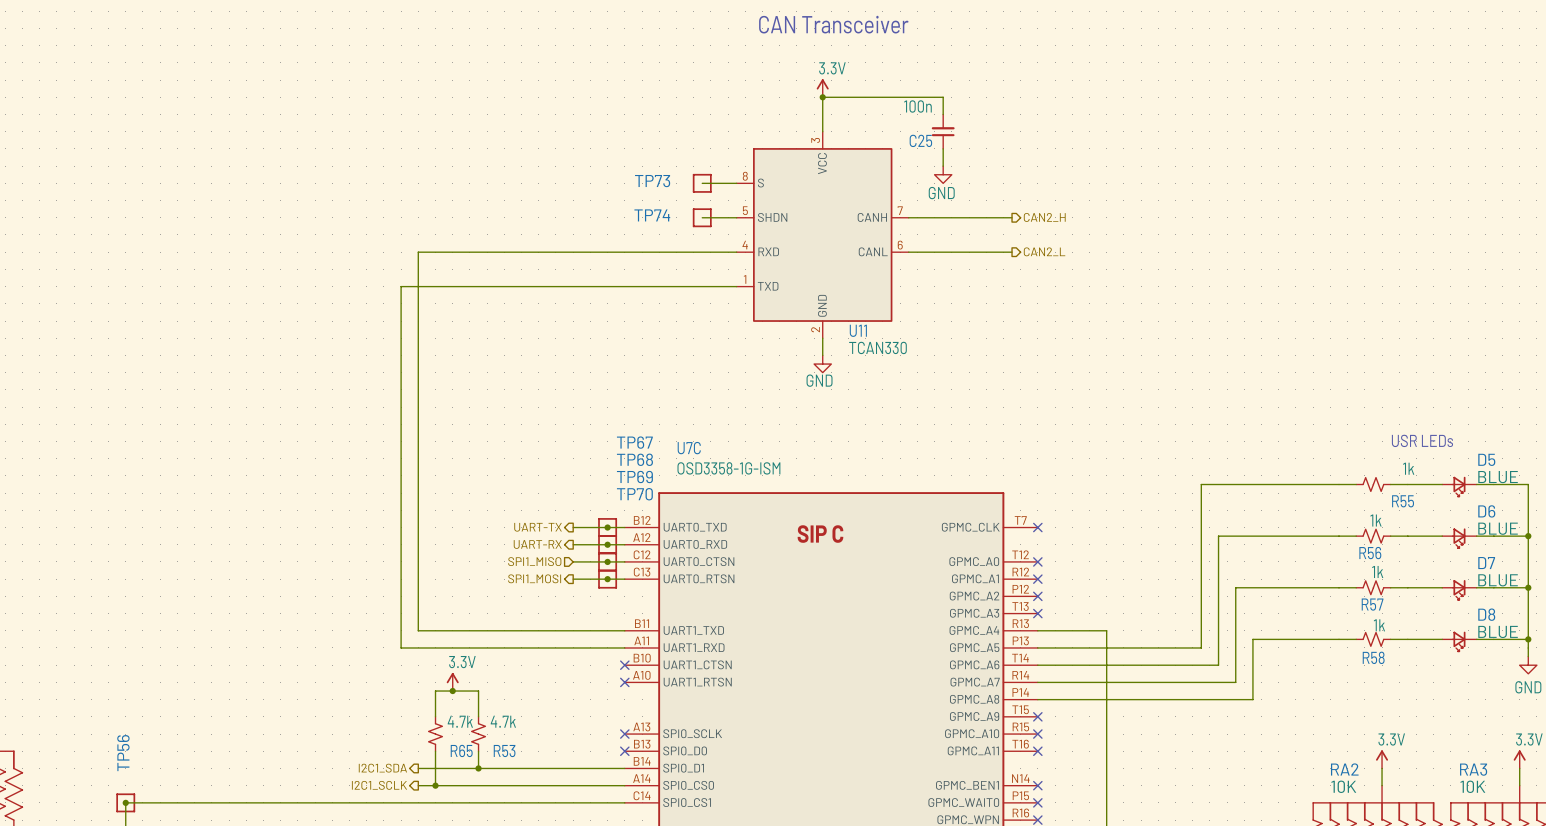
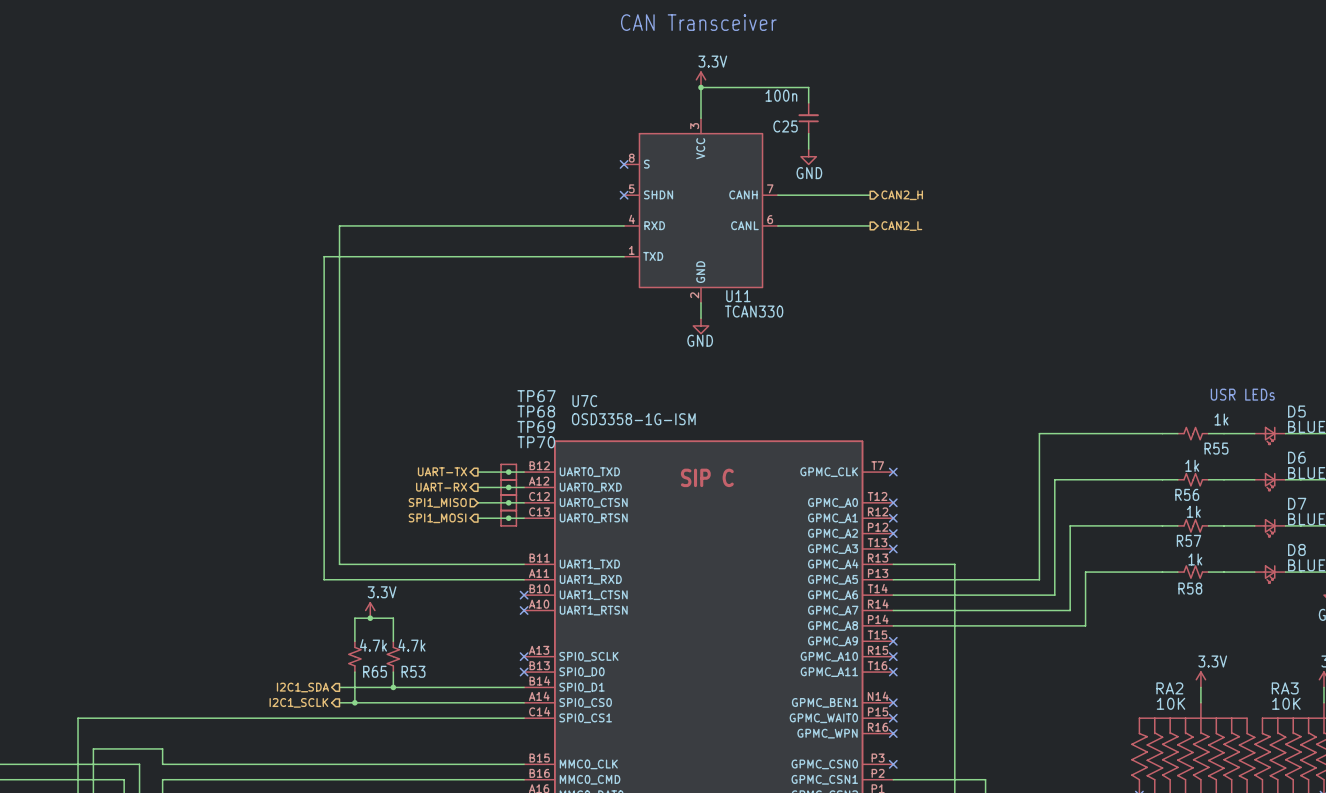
wire: (702, 183) (736, 183) -> none
TP73: (702, 183) -> none
no-connect mark: none -> (624, 164)
wire: (702, 217) (736, 217) -> none
TP74: (702, 217) -> none
no-connect mark: none -> (624, 195)
junction: (125, 802) -> none
TP56: (125, 802) -> none

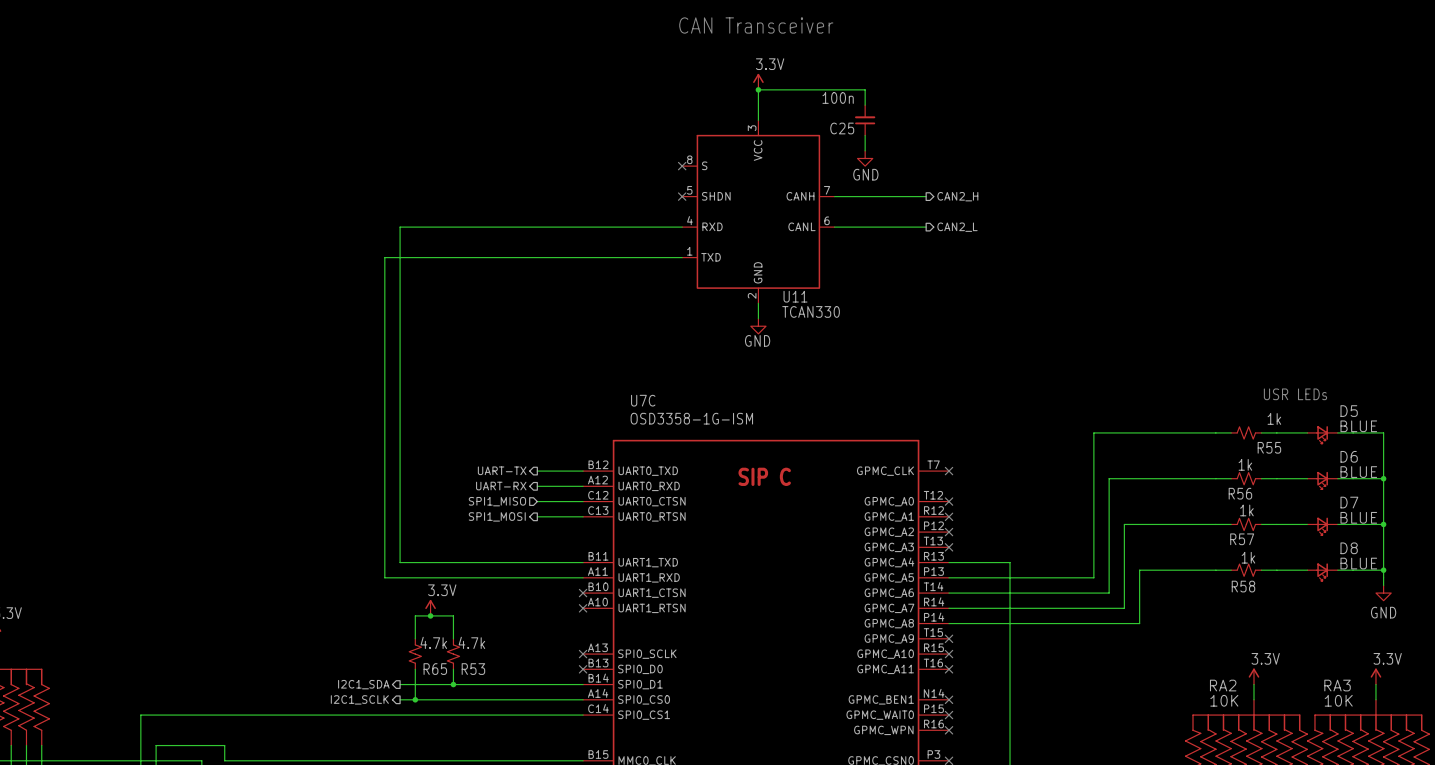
junction: (508, 472) -> none
TP67: (508, 472) -> none
junction: (508, 487) -> none
TP68: (508, 487) -> none
junction: (508, 502) -> none
TP69: (508, 502) -> none
junction: (508, 518) -> none
TP70: (508, 518) -> none

